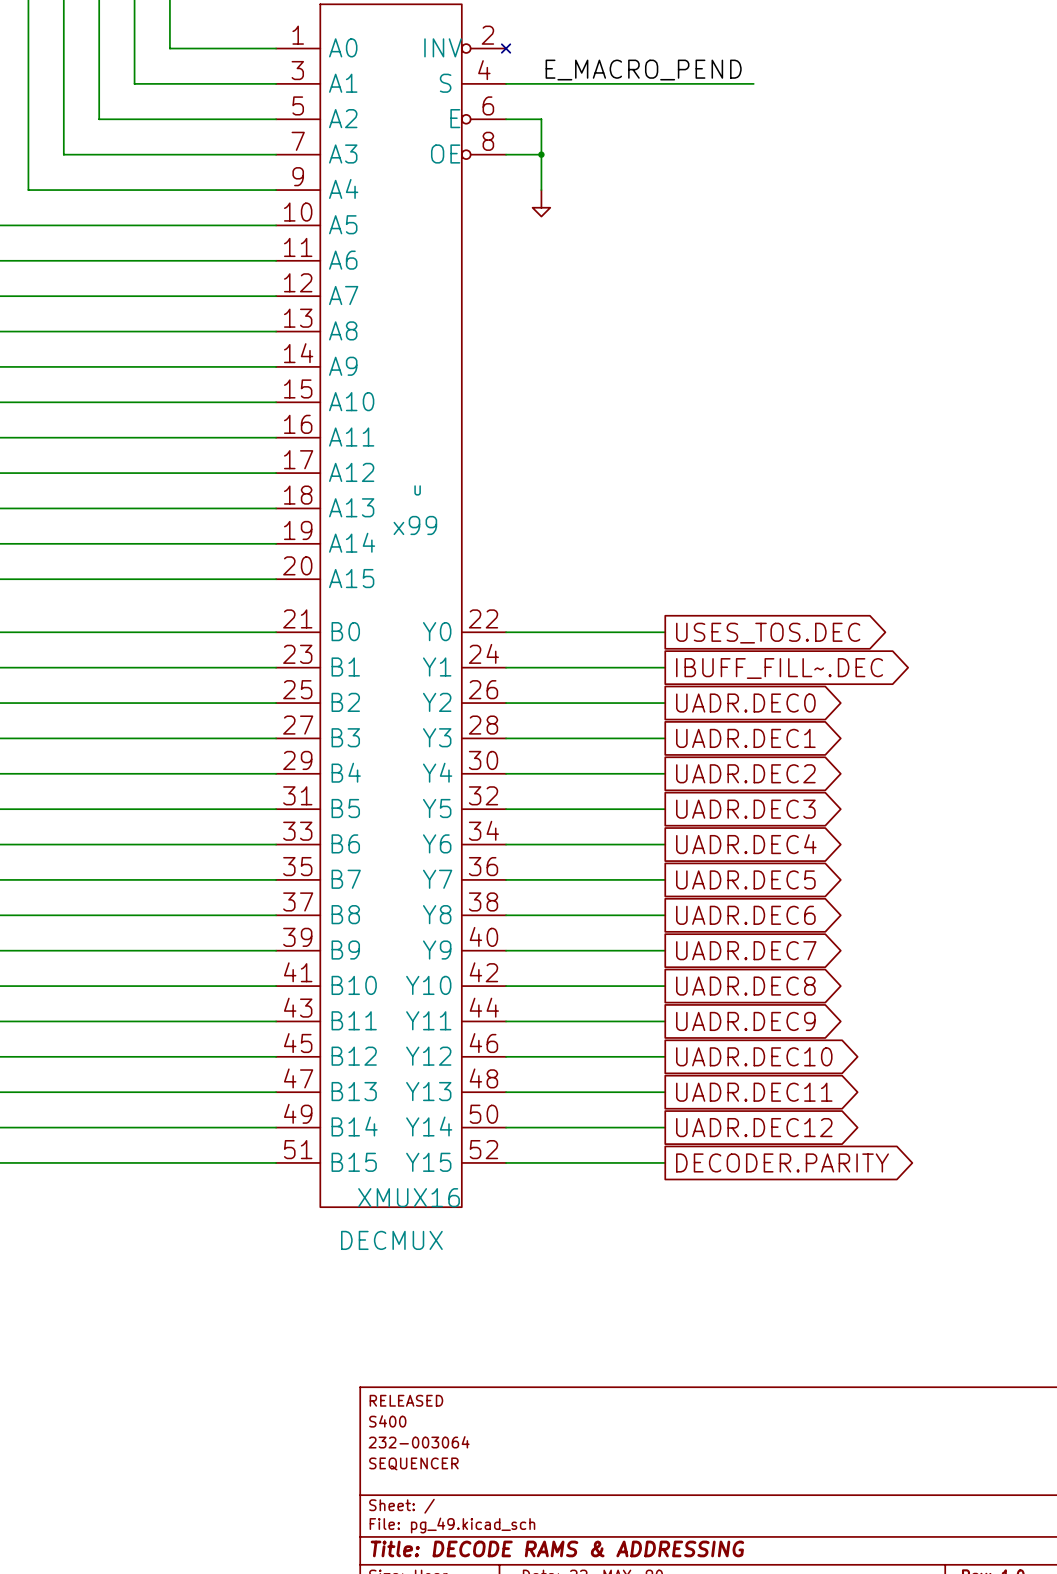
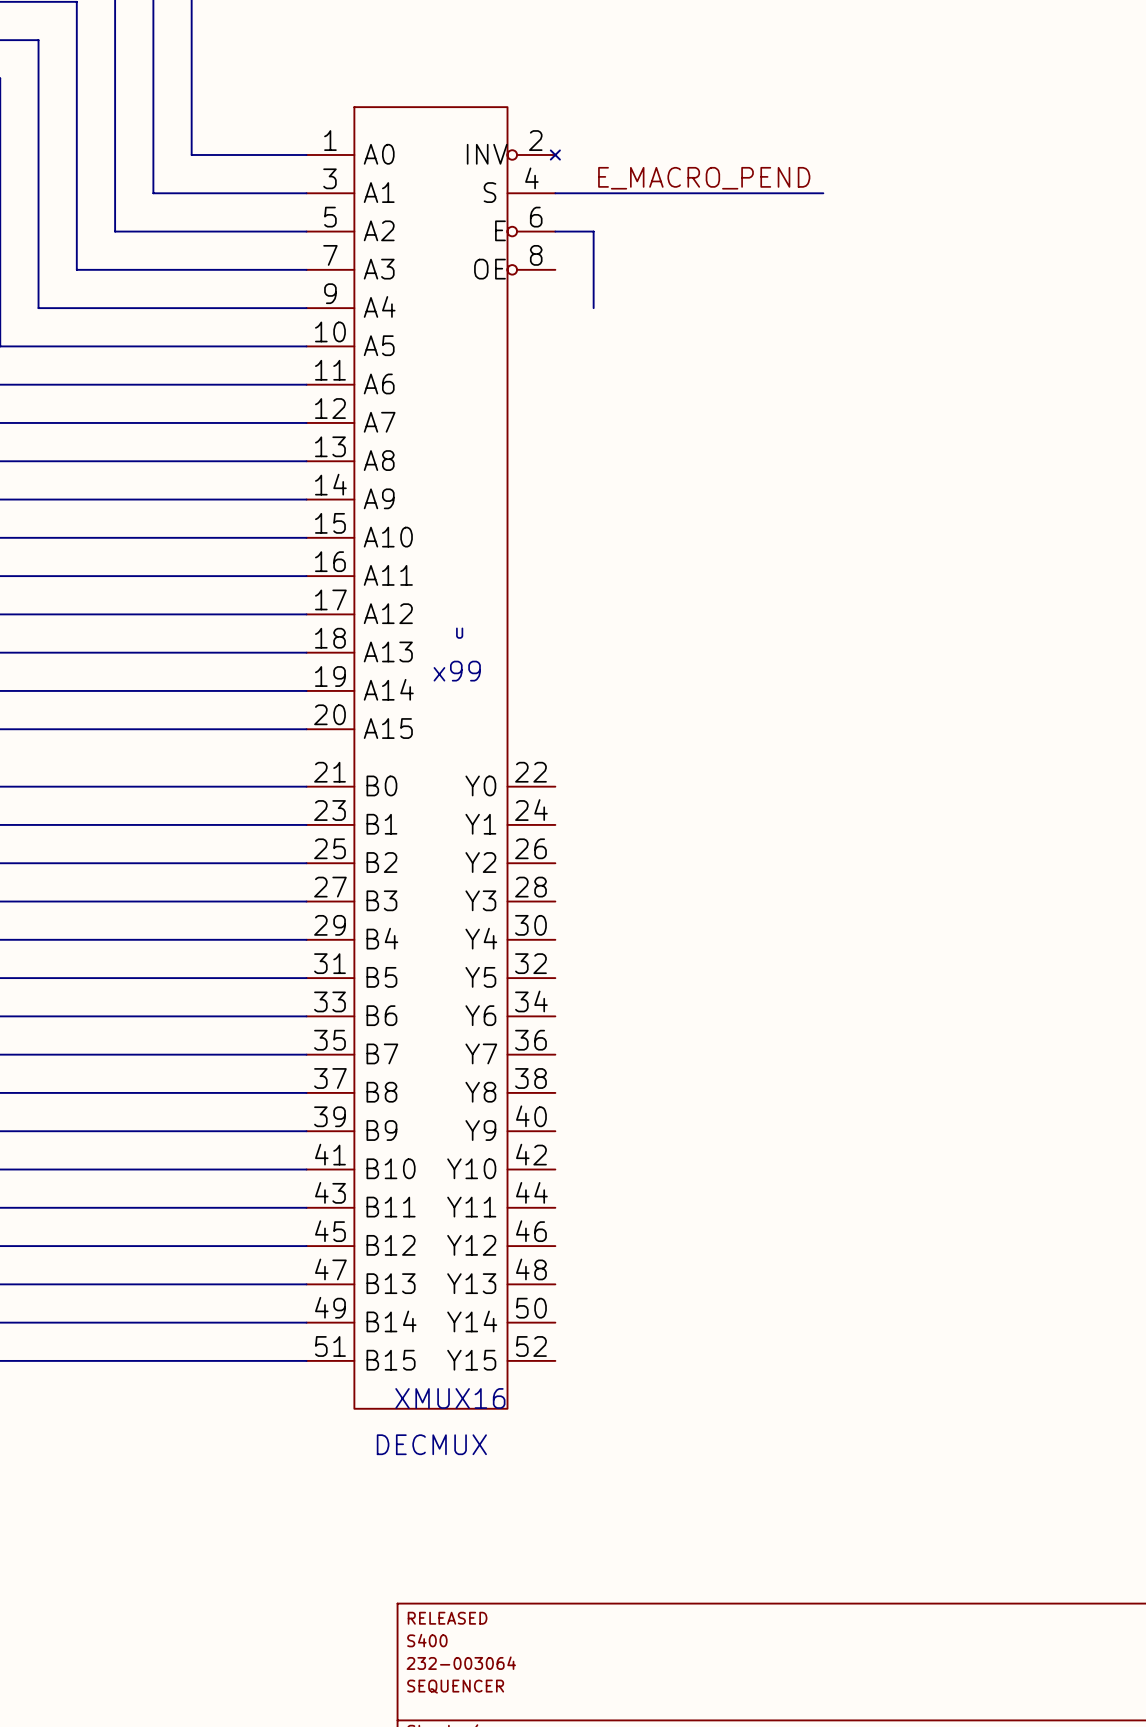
wire: (506, 154) (541, 154) -> none
junction: (541, 154) -> none
power symbol: (541, 203) -> none
wire: (506, 632) (665, 632) -> none
global label: USES_TOS.DEC (768, 633) -> none
wire: (506, 667) (665, 667) -> none
global label: IBUFF_FILL~.DEC (779, 668) -> none
wire: (506, 703) (665, 703) -> none
global label: UADR.DEC0 (745, 703) -> none
wire: (506, 738) (665, 738) -> none
global label: UADR.DEC1 (745, 738) -> none
wire: (506, 773) (665, 773) -> none
global label: UADR.DEC2 (745, 773) -> none
wire: (506, 809) (665, 809) -> none
global label: UADR.DEC3 (745, 809) -> none
wire: (506, 844) (665, 844) -> none
global label: UADR.DEC4 (746, 844) -> none
wire: (506, 879) (665, 879) -> none
global label: UADR.DEC5 (745, 879) -> none
wire: (506, 915) (665, 915) -> none
global label: UADR.DEC6 (745, 915) -> none
wire: (506, 950) (665, 950) -> none
global label: UADR.DEC7 (746, 950) -> none
wire: (506, 986) (665, 986) -> none
global label: UADR.DEC8 (745, 986) -> none
wire: (506, 1021) (665, 1021) -> none
global label: UADR.DEC9 (745, 1021) -> none
wire: (506, 1056) (665, 1056) -> none
global label: UADR.DEC10 (754, 1056) -> none
wire: (506, 1092) (665, 1092) -> none
global label: UADR.DEC11 (754, 1092) -> none
wire: (506, 1127) (665, 1127) -> none
global label: UADR.DEC12 (754, 1127) -> none
wire: (506, 1162) (665, 1162) -> none
global label: DECODER.PARITY (782, 1162) -> none

